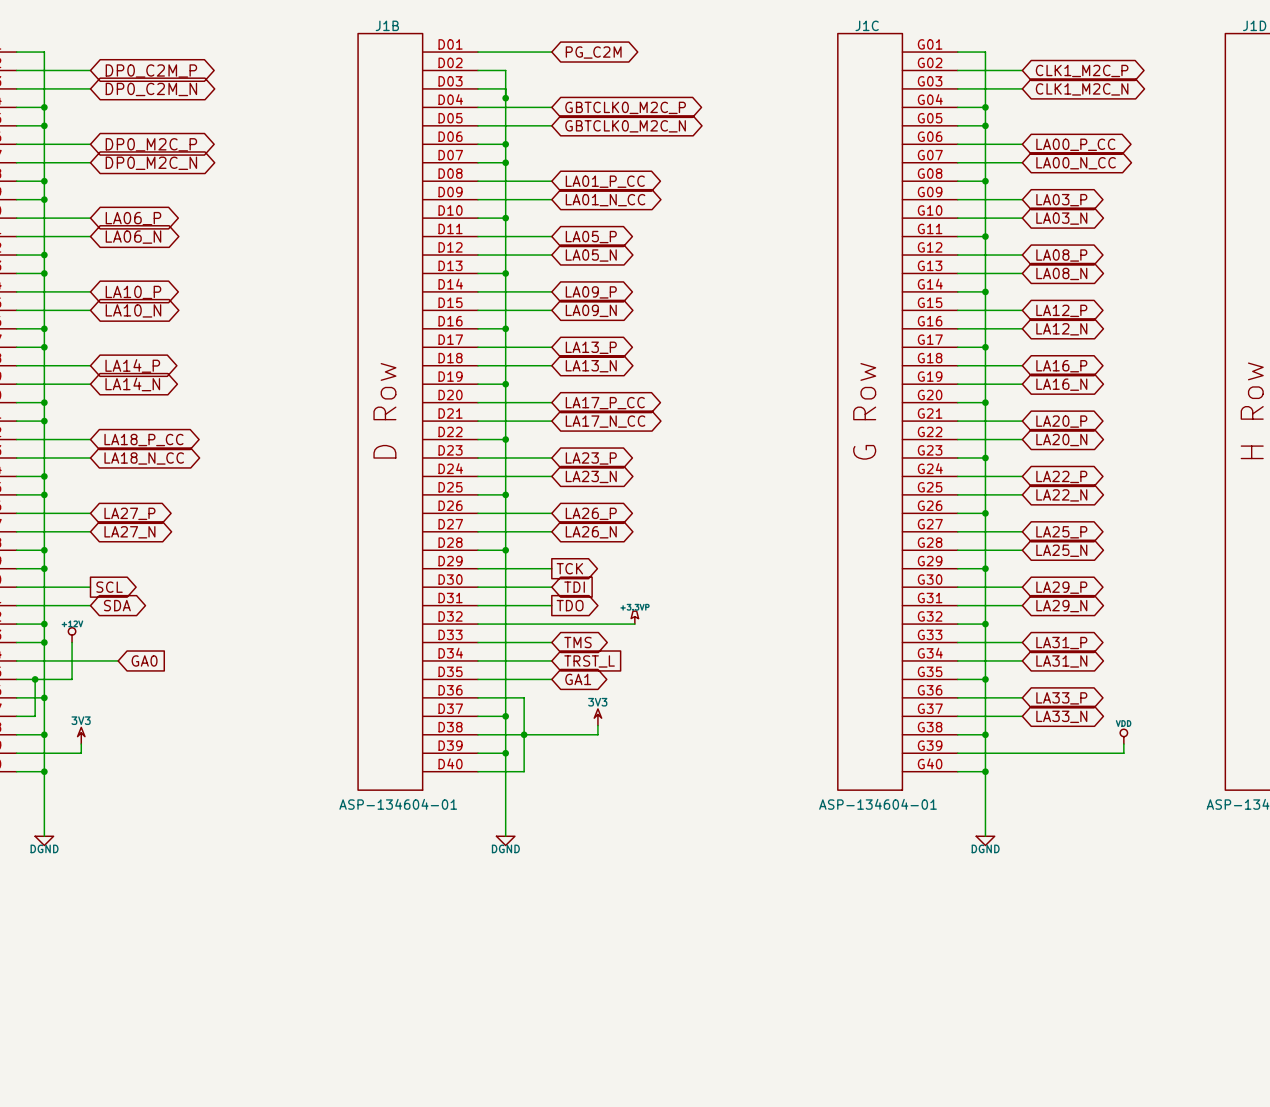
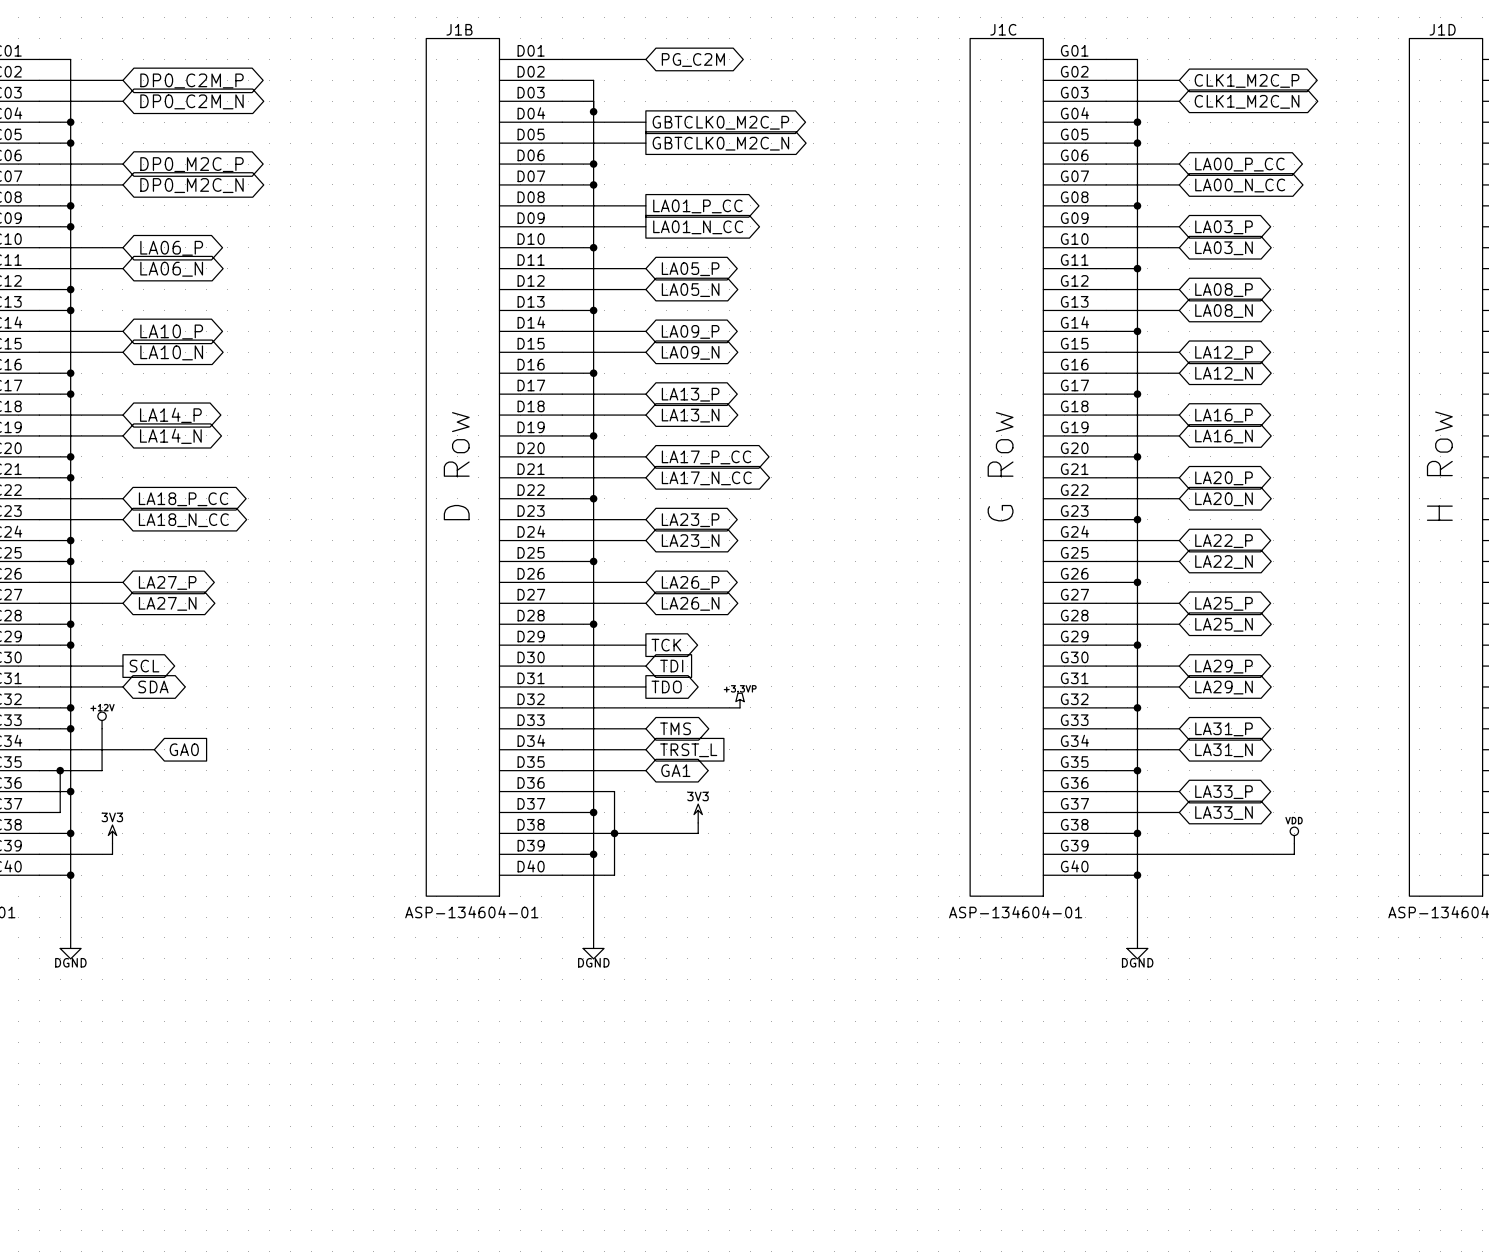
global label shape: bidirectional (625, 107) -> output (720, 122)
global label shape: bidirectional (625, 126) -> output (720, 143)
global label shape: bidirectional (605, 181) -> output (697, 206)
global label shape: bidirectional (605, 200) -> output (698, 227)

